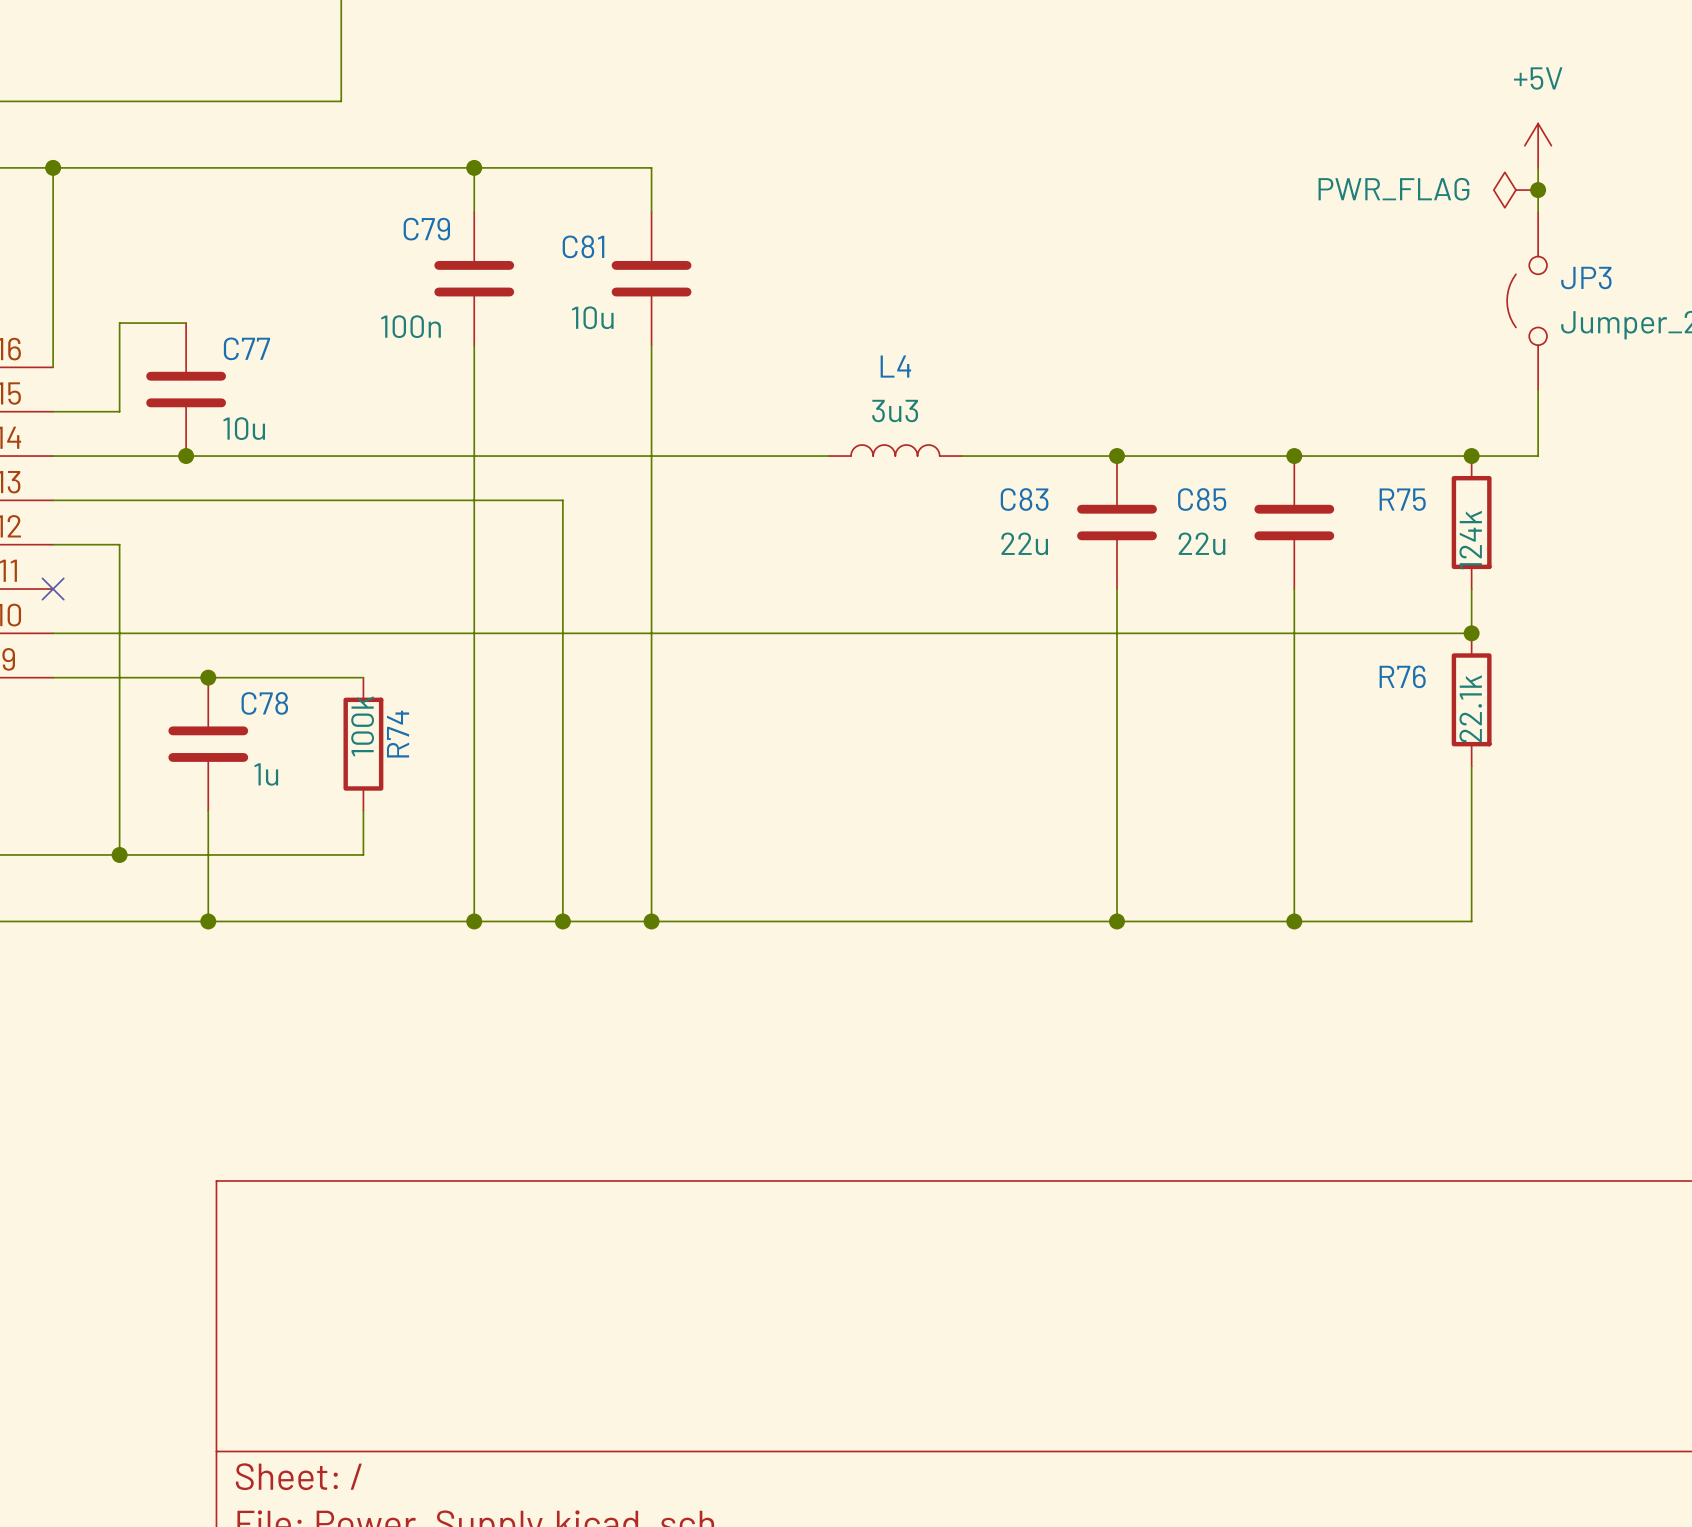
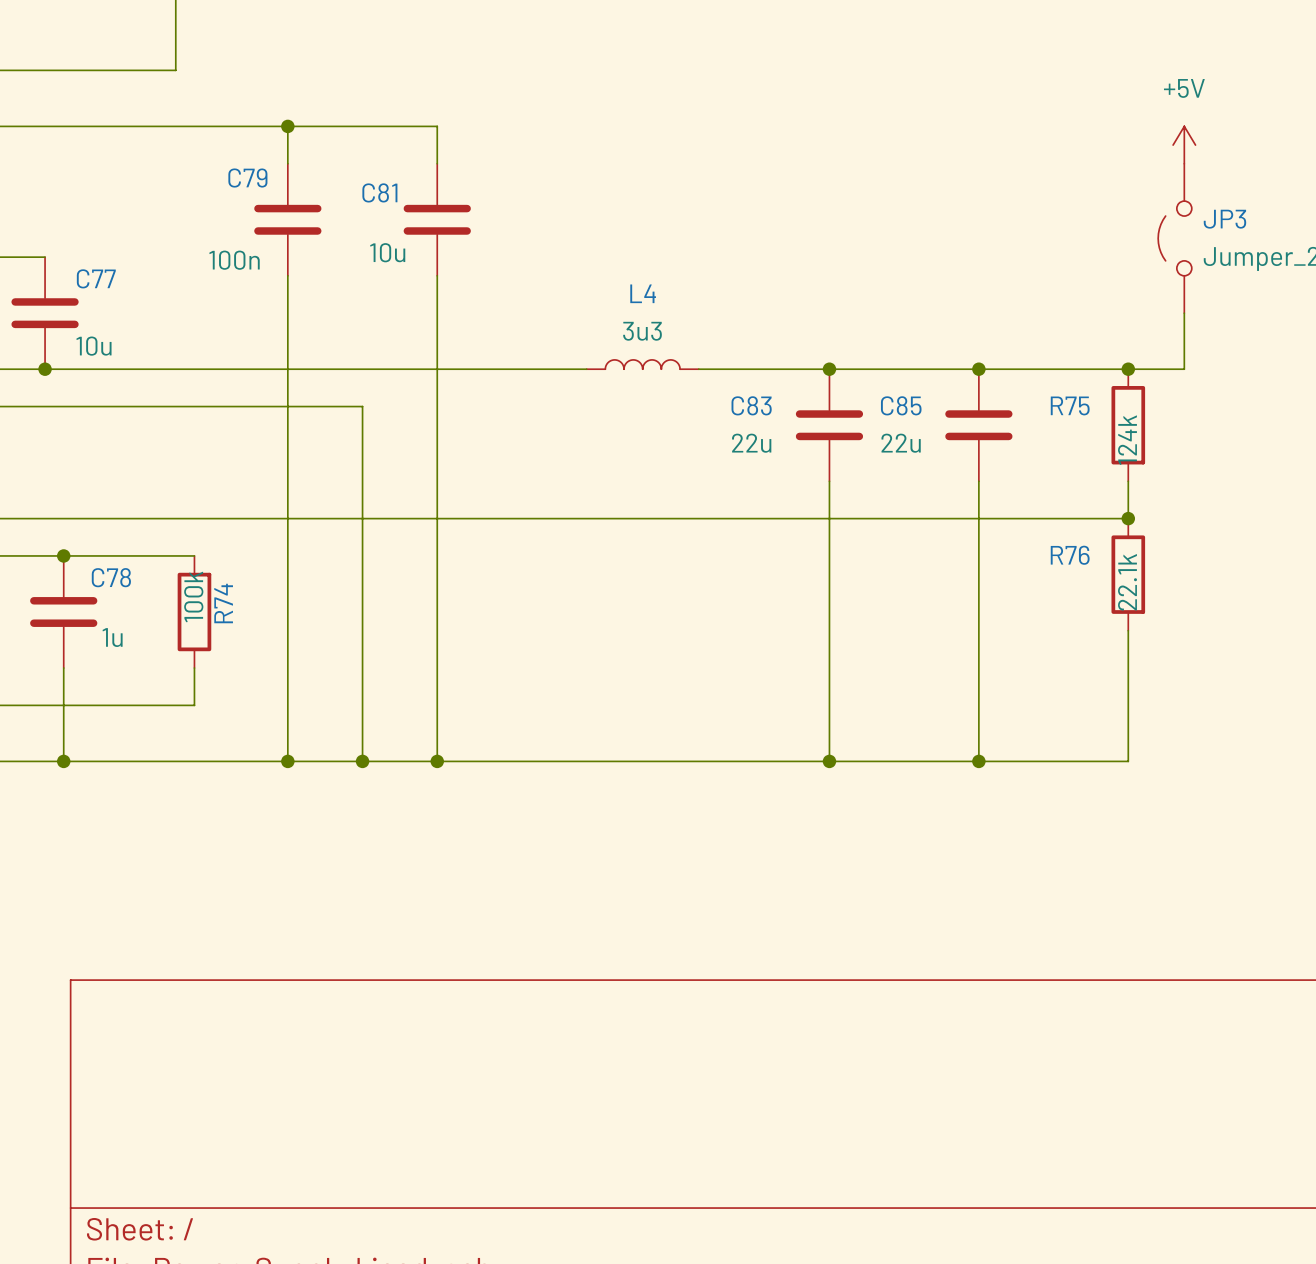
power symbol position: +5V (1538, 145) -> +5V (1184, 145)
power symbol: PWR_FLAG (1515, 190) -> none
junction: (1538, 190) -> none

